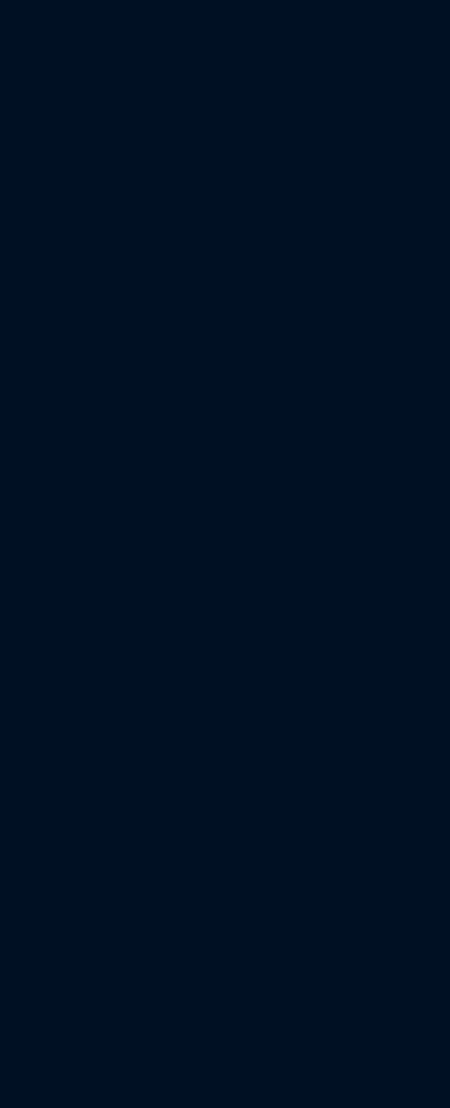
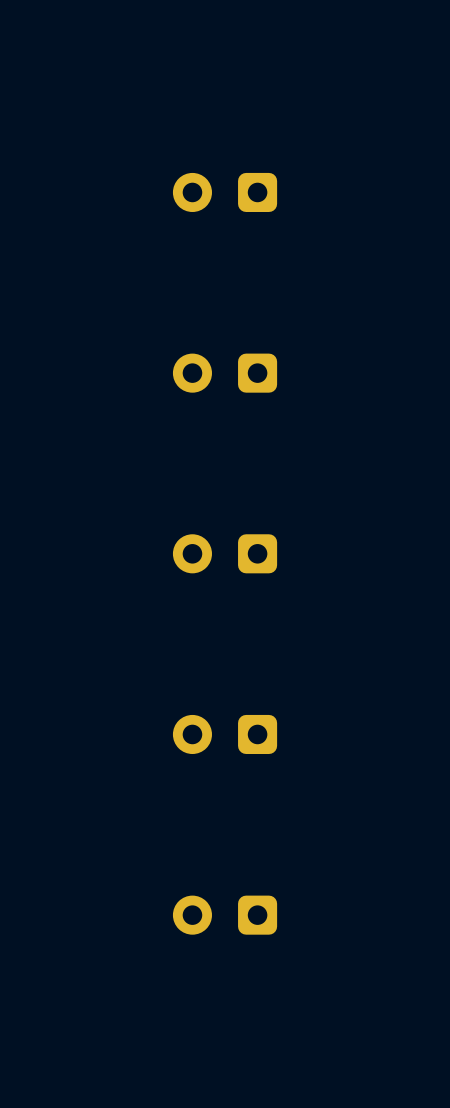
part: none -> (225, 192)
part: none -> (225, 373)
part: none -> (225, 553)
part: none -> (225, 734)
part: none -> (225, 915)

